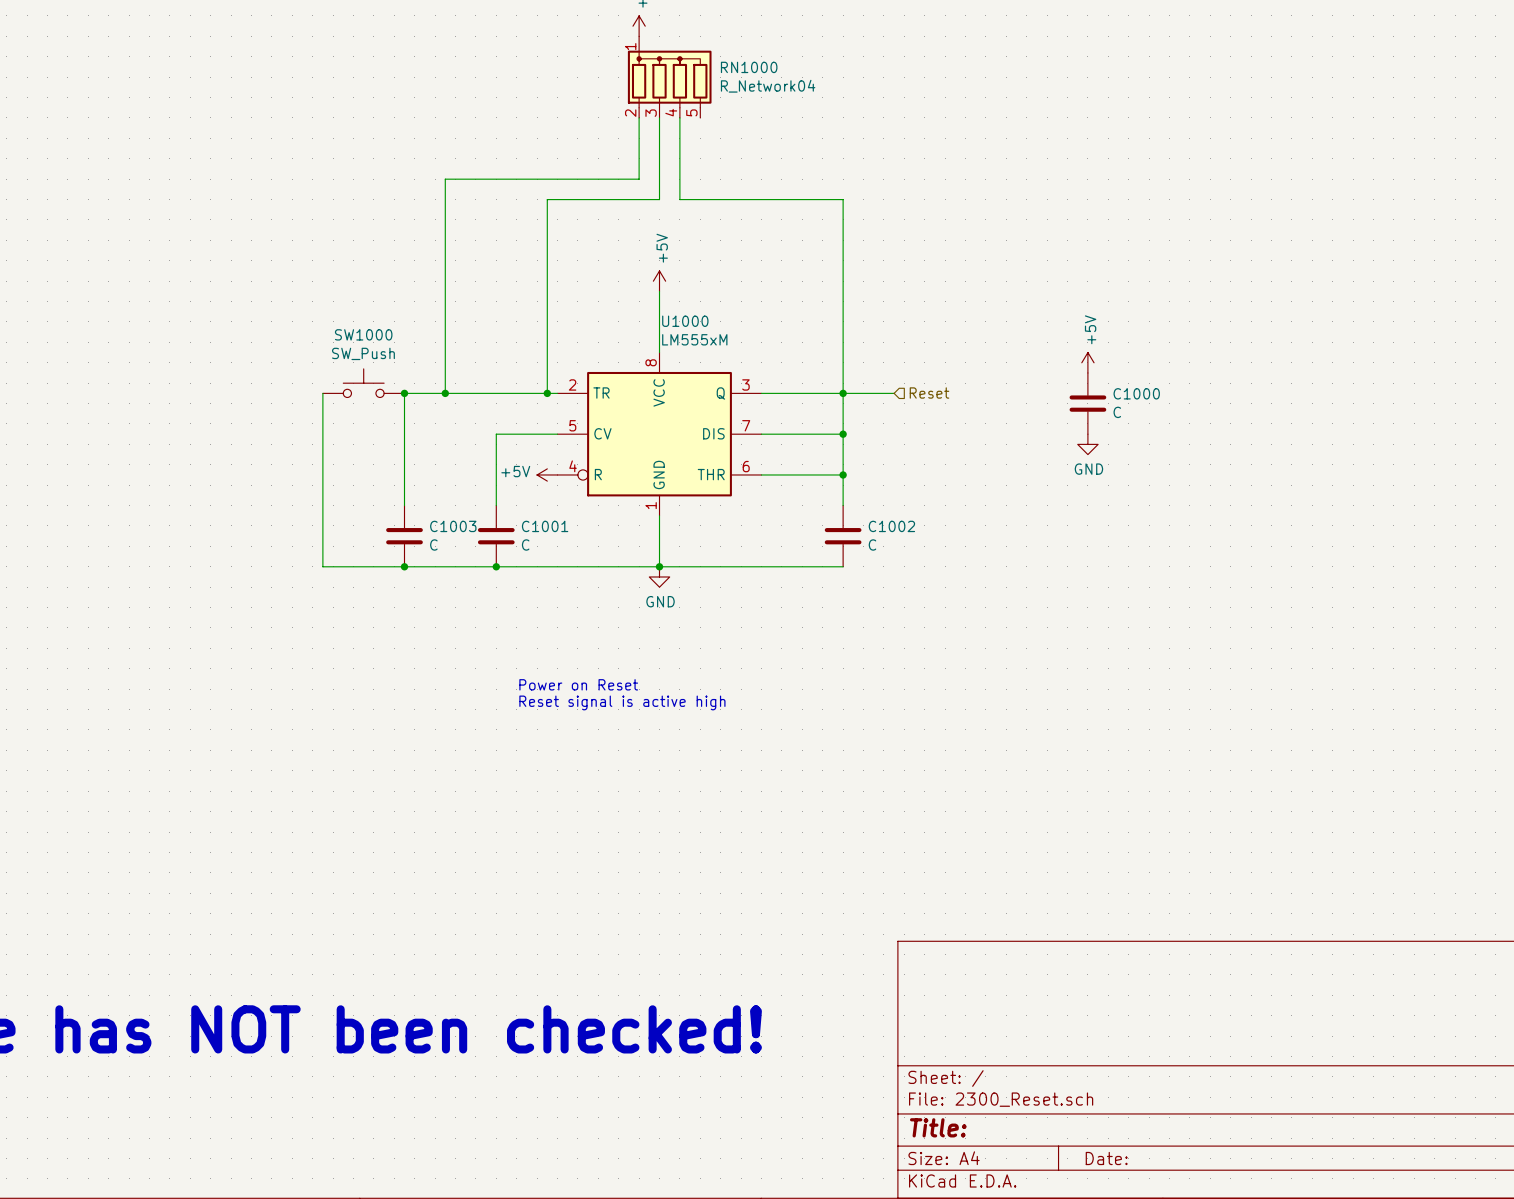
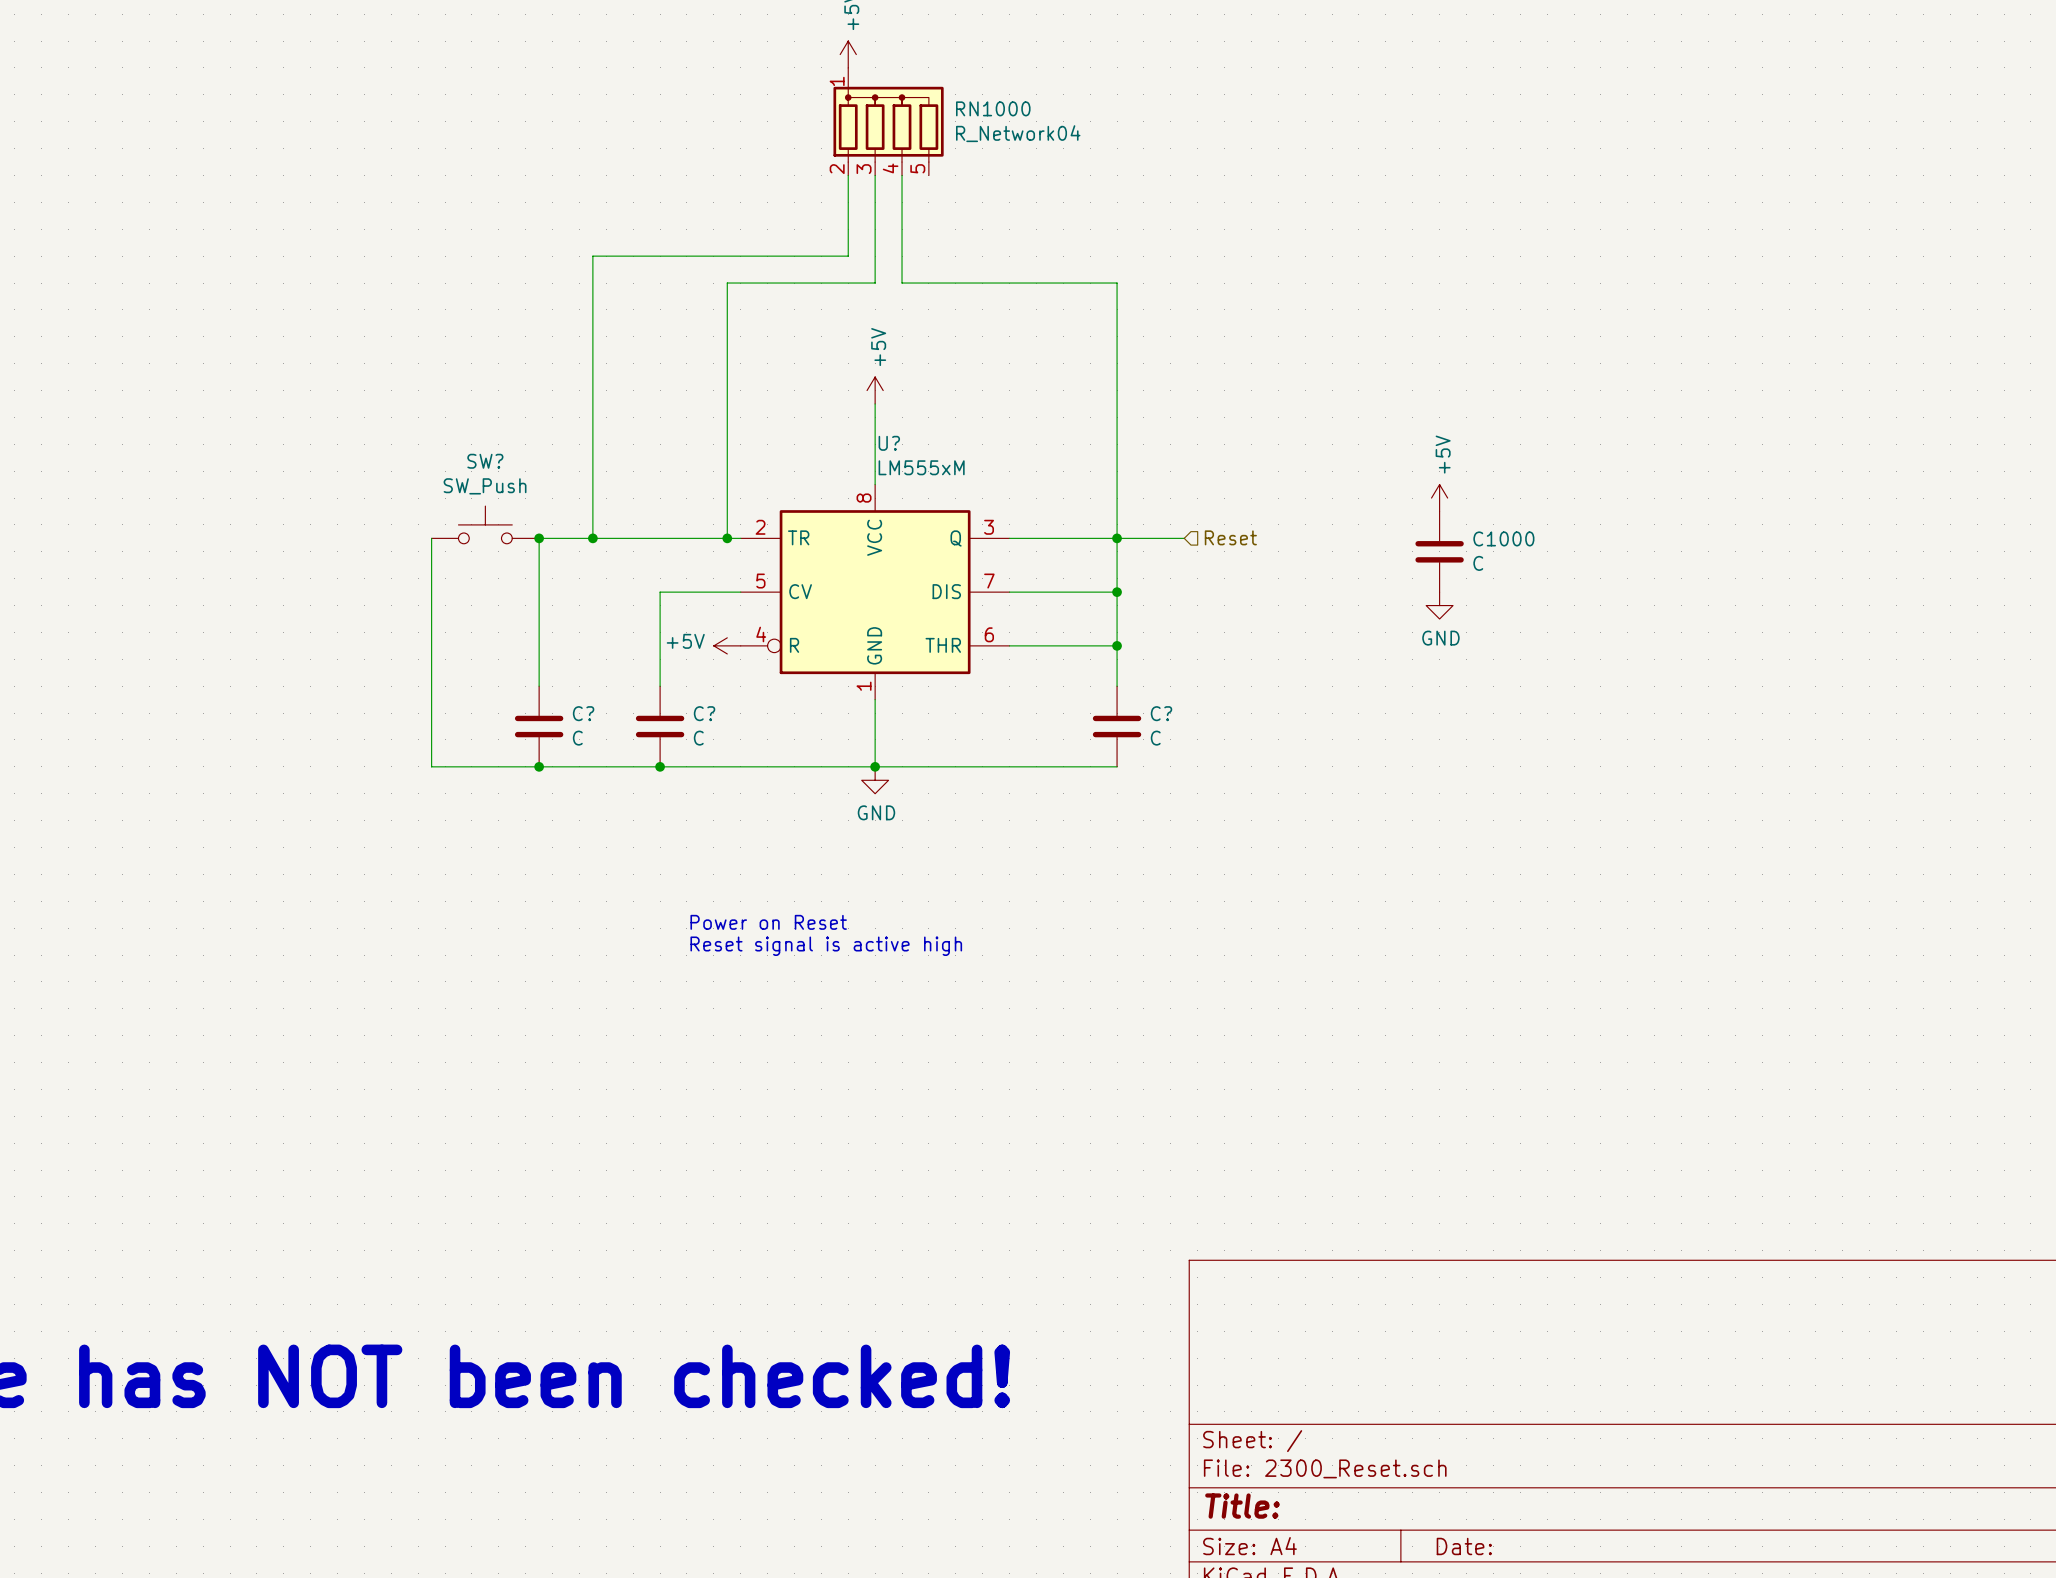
U1000 name: U1000 (685, 321) -> U? (889, 443)
SW1000 name: SW1000 (363, 334) -> SW? (485, 461)
C1003 name: C1003 (453, 526) -> C? (583, 713)
C1001 name: C1001 (545, 526) -> C? (704, 713)
C1002 name: C1002 (891, 526) -> C? (1161, 713)

